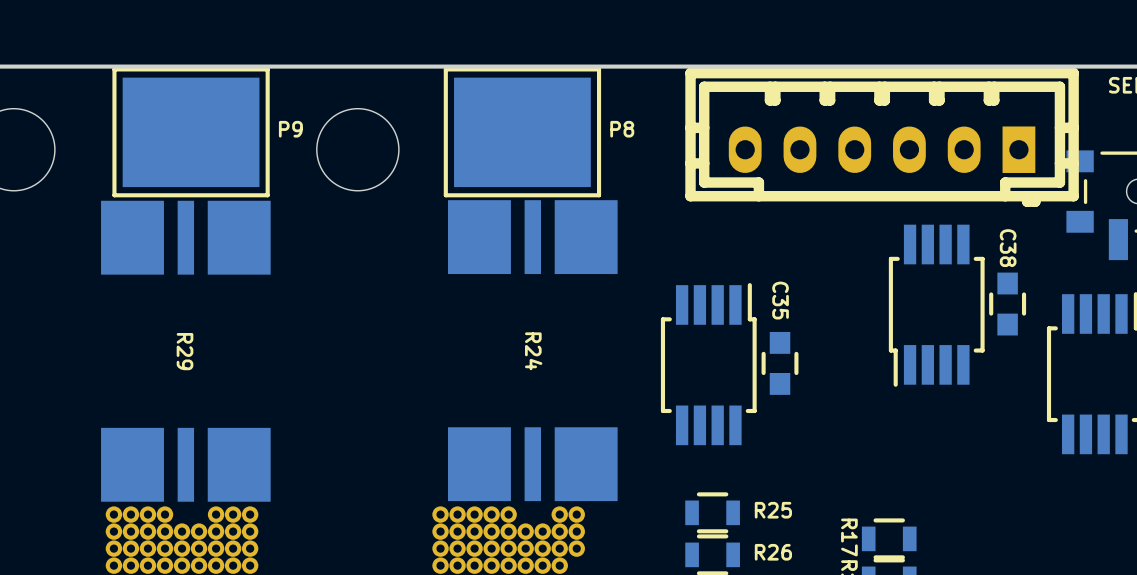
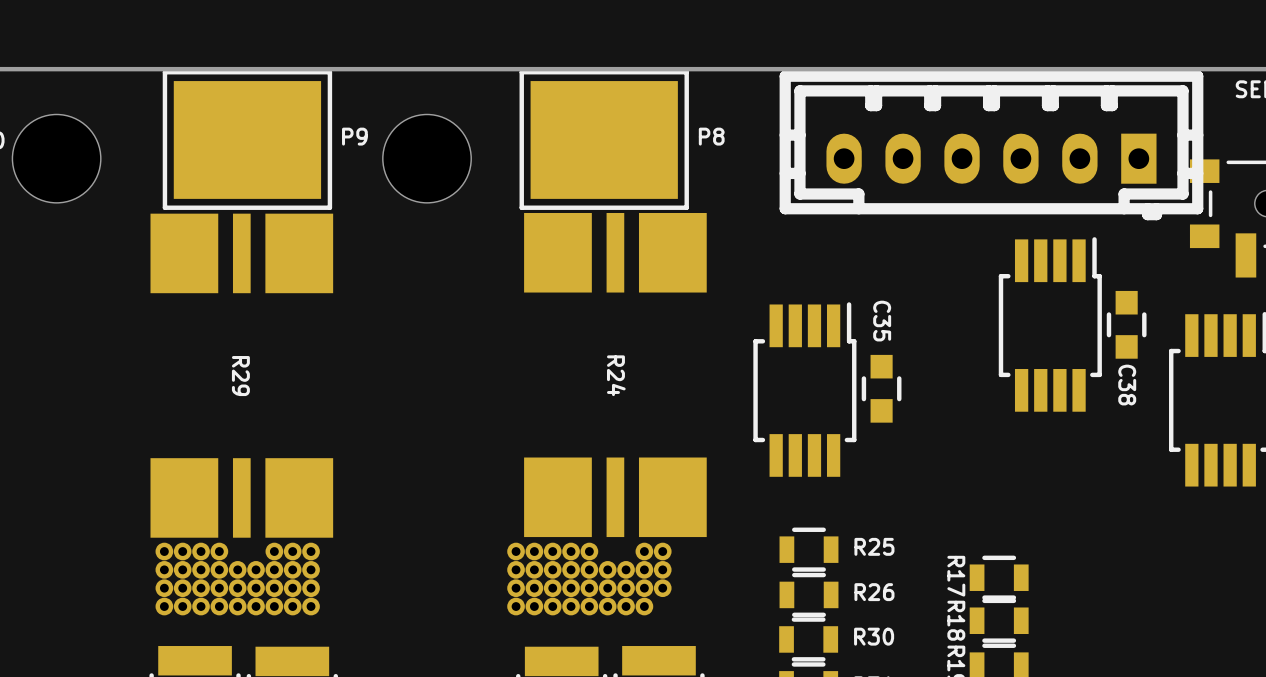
C38 name position: C38 (1008, 248) -> C38 (1127, 385)
part rotation: 0° (936, 305) -> 180° (1050, 324)

